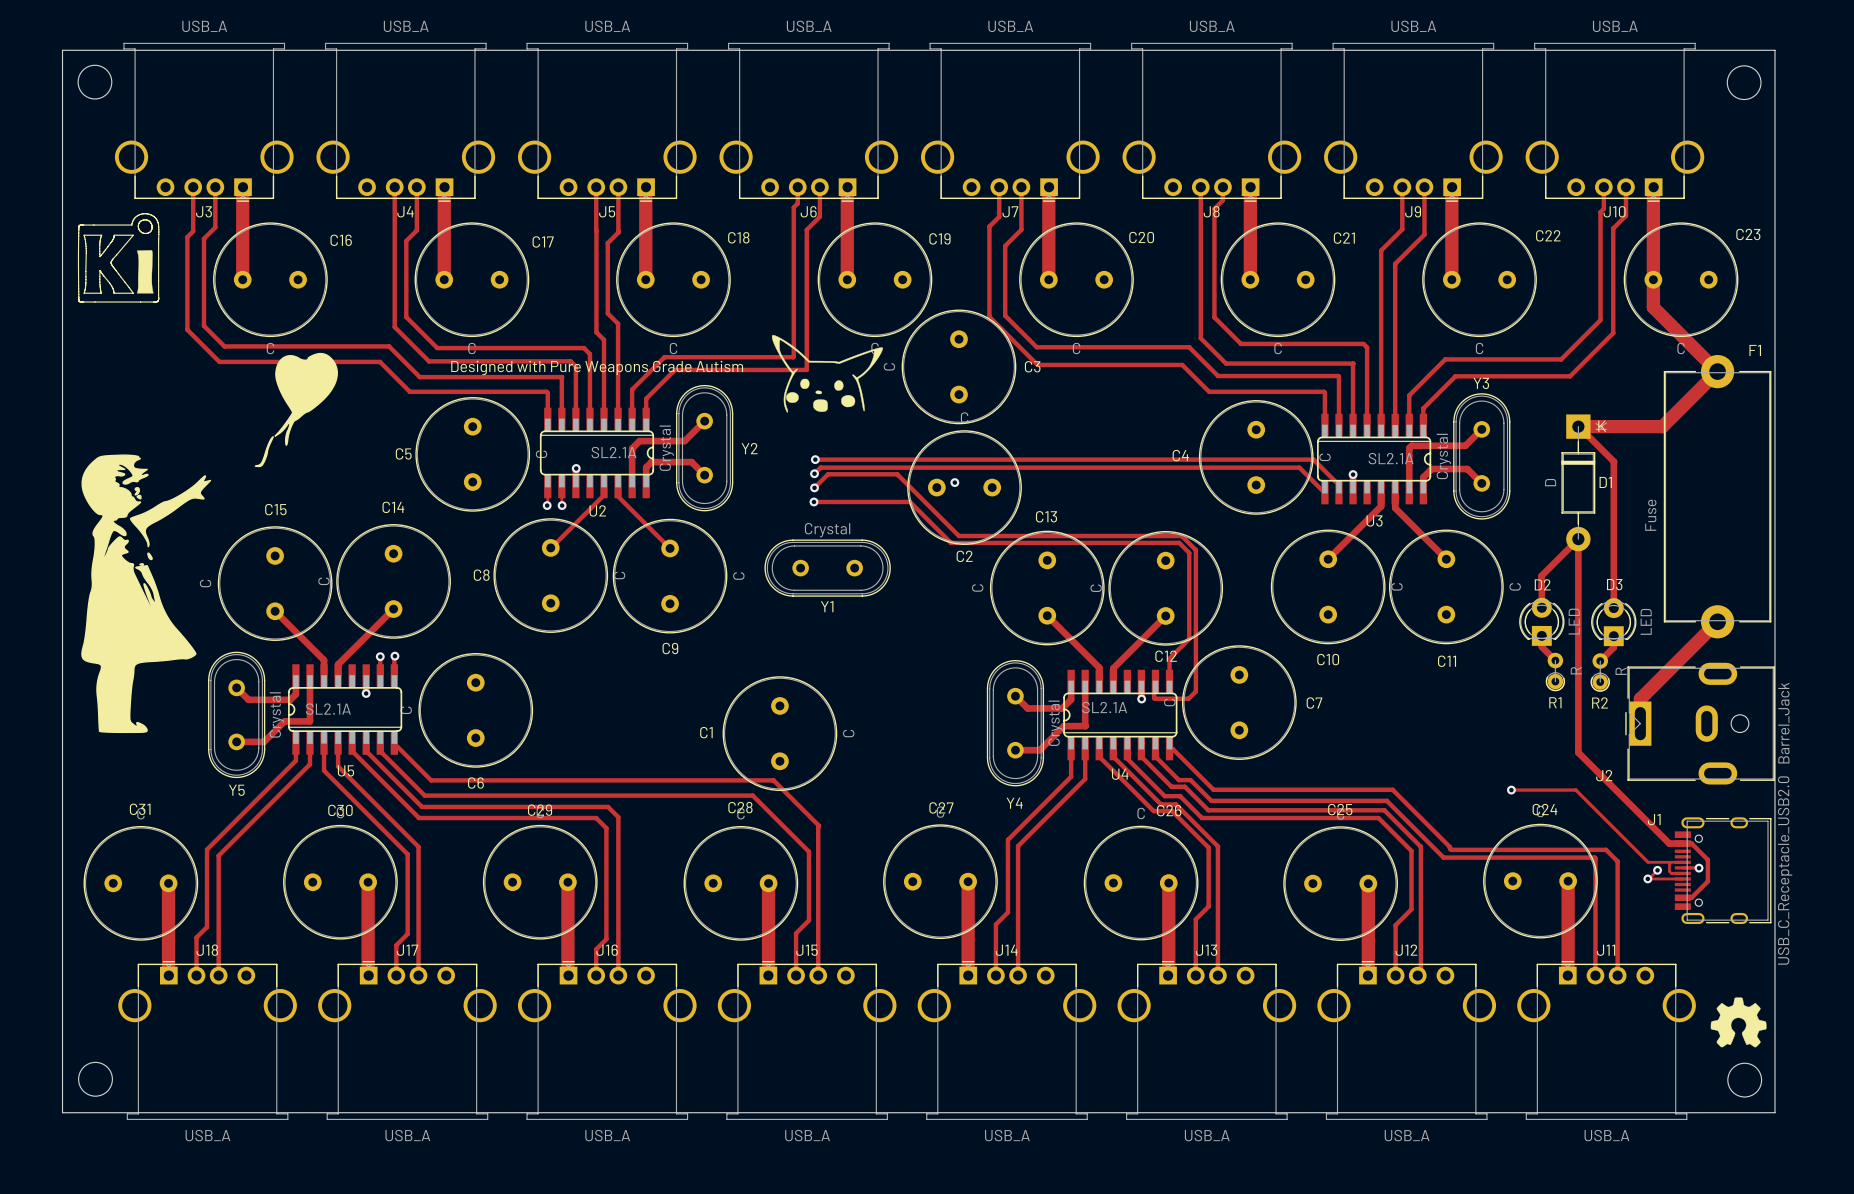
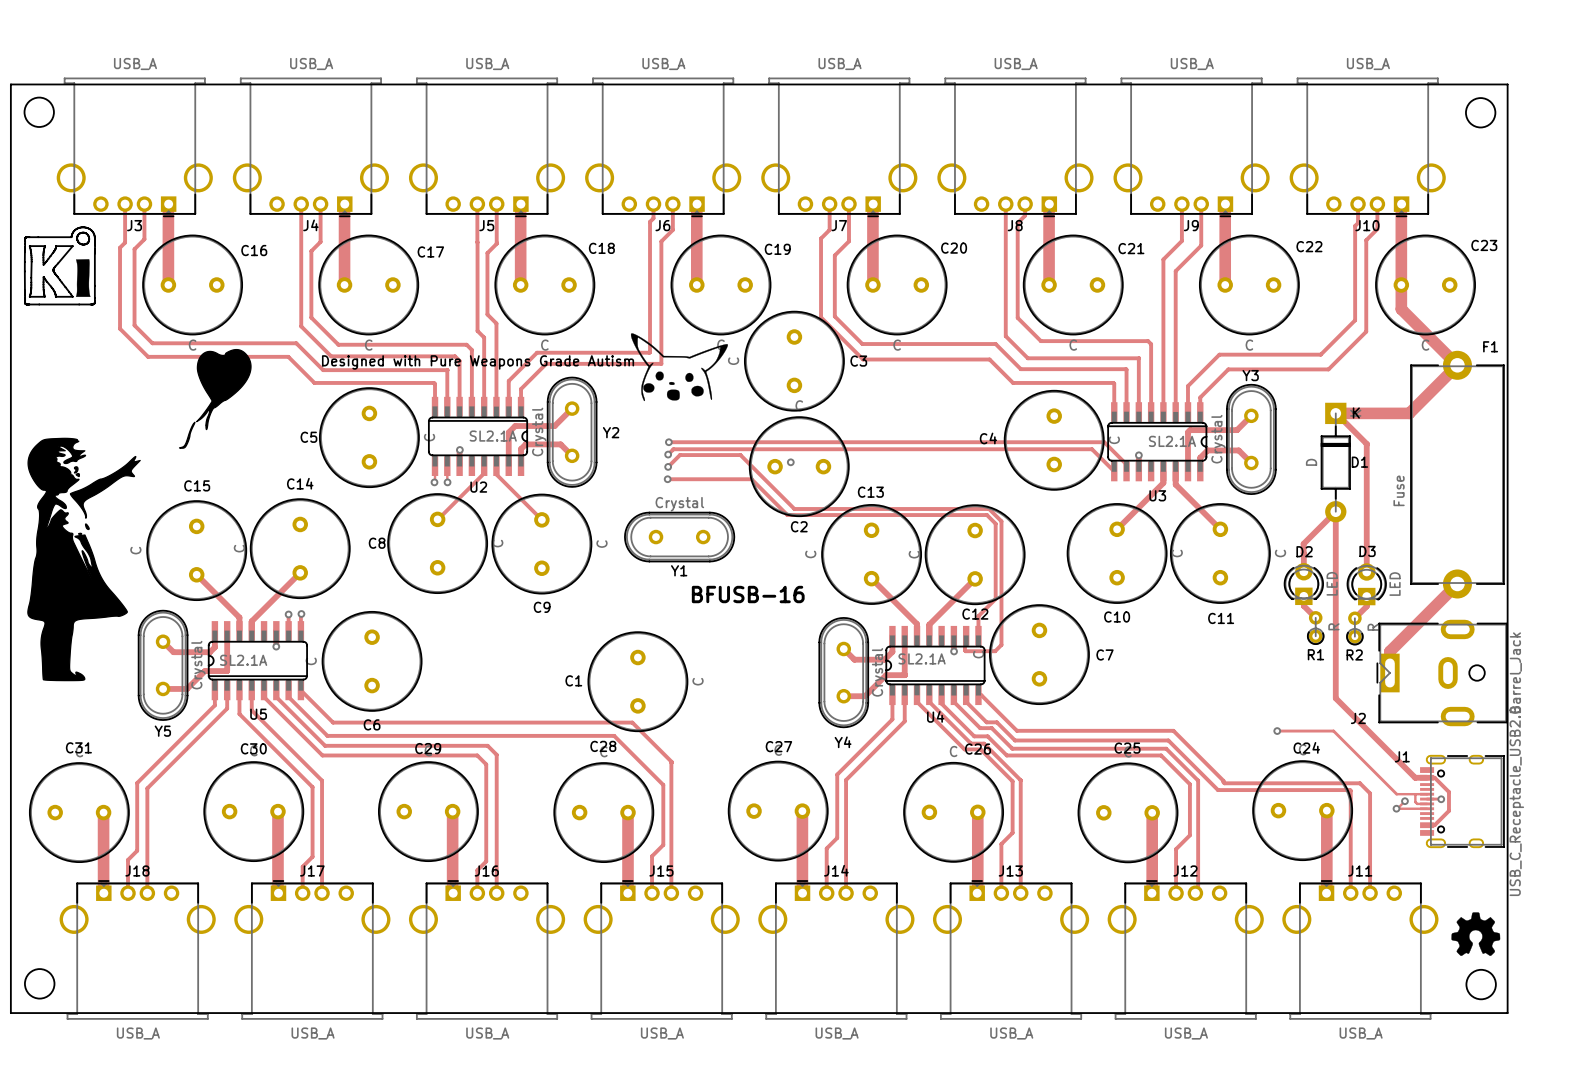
text: none -> BFUSB-16 (748, 594)

